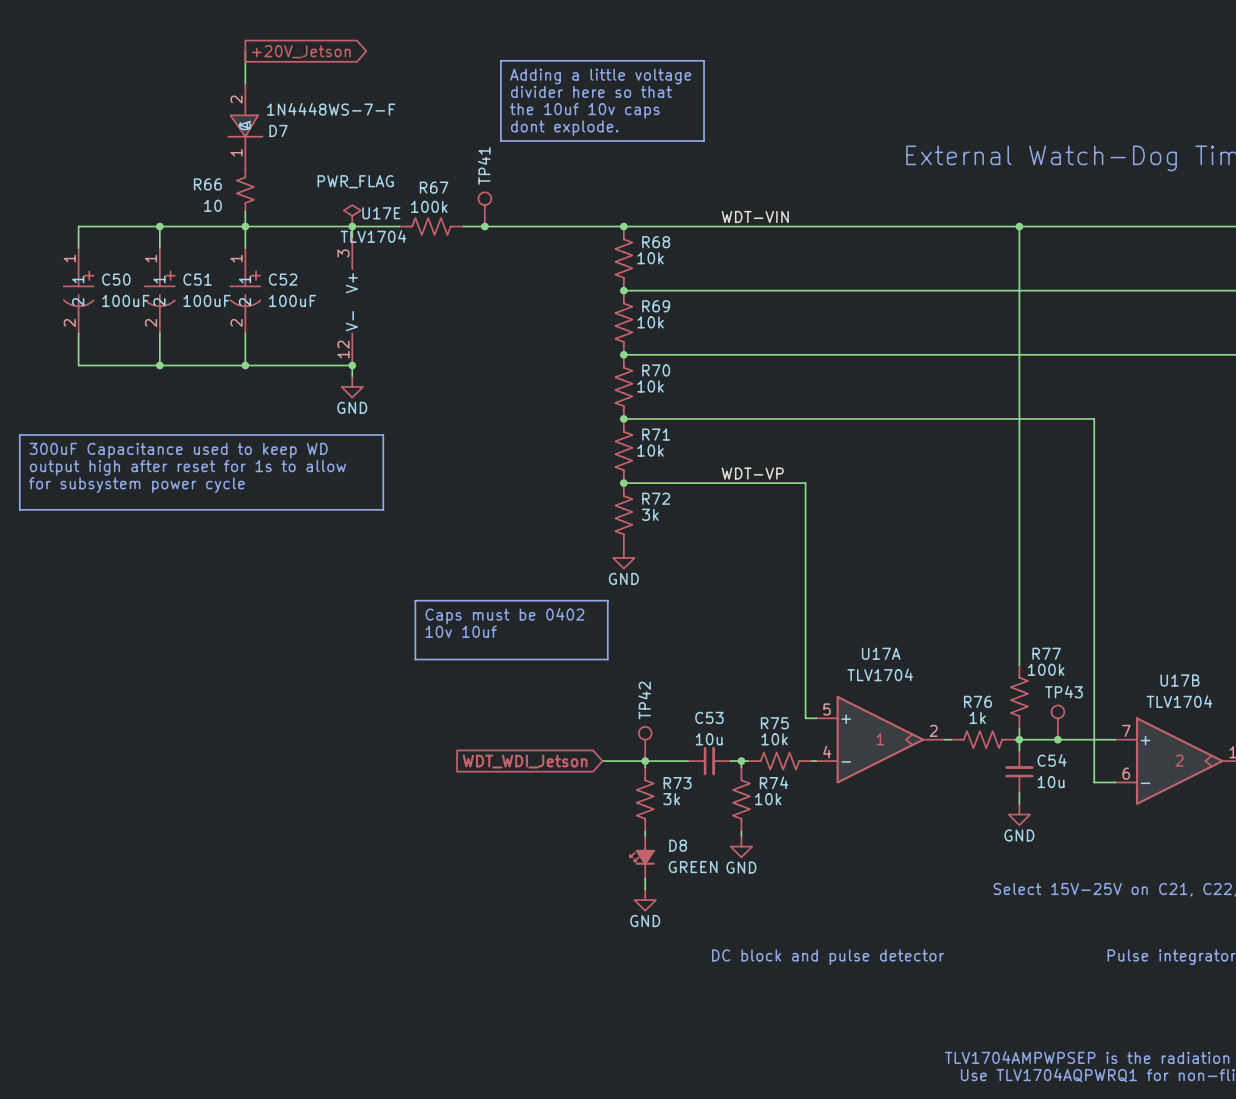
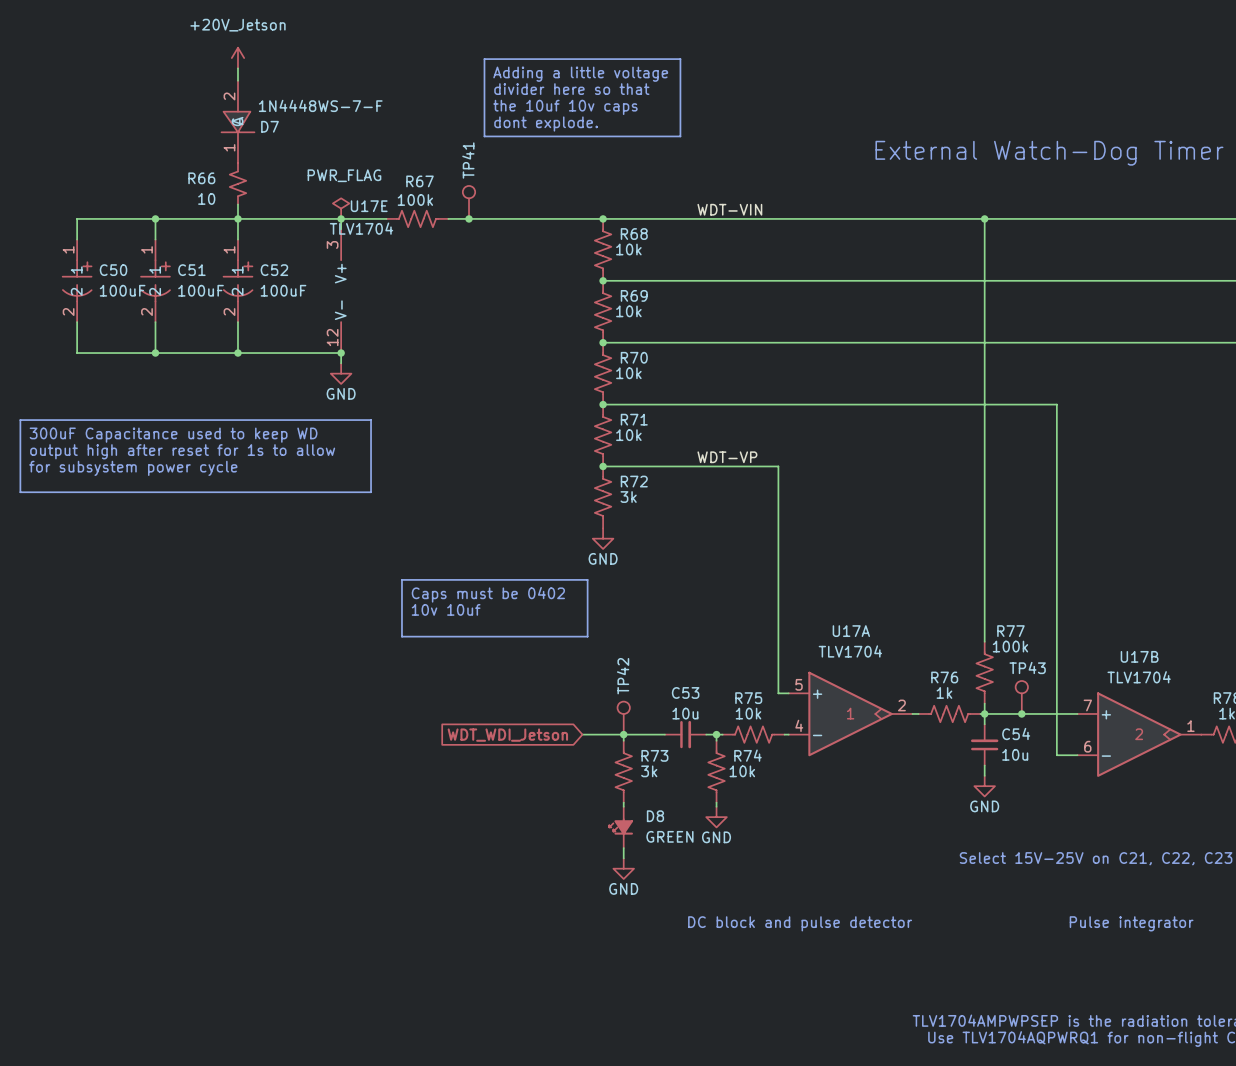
global label: +20V_Jetson (301, 51) -> none
power symbol: none -> +20V_Jetson (237, 58)

